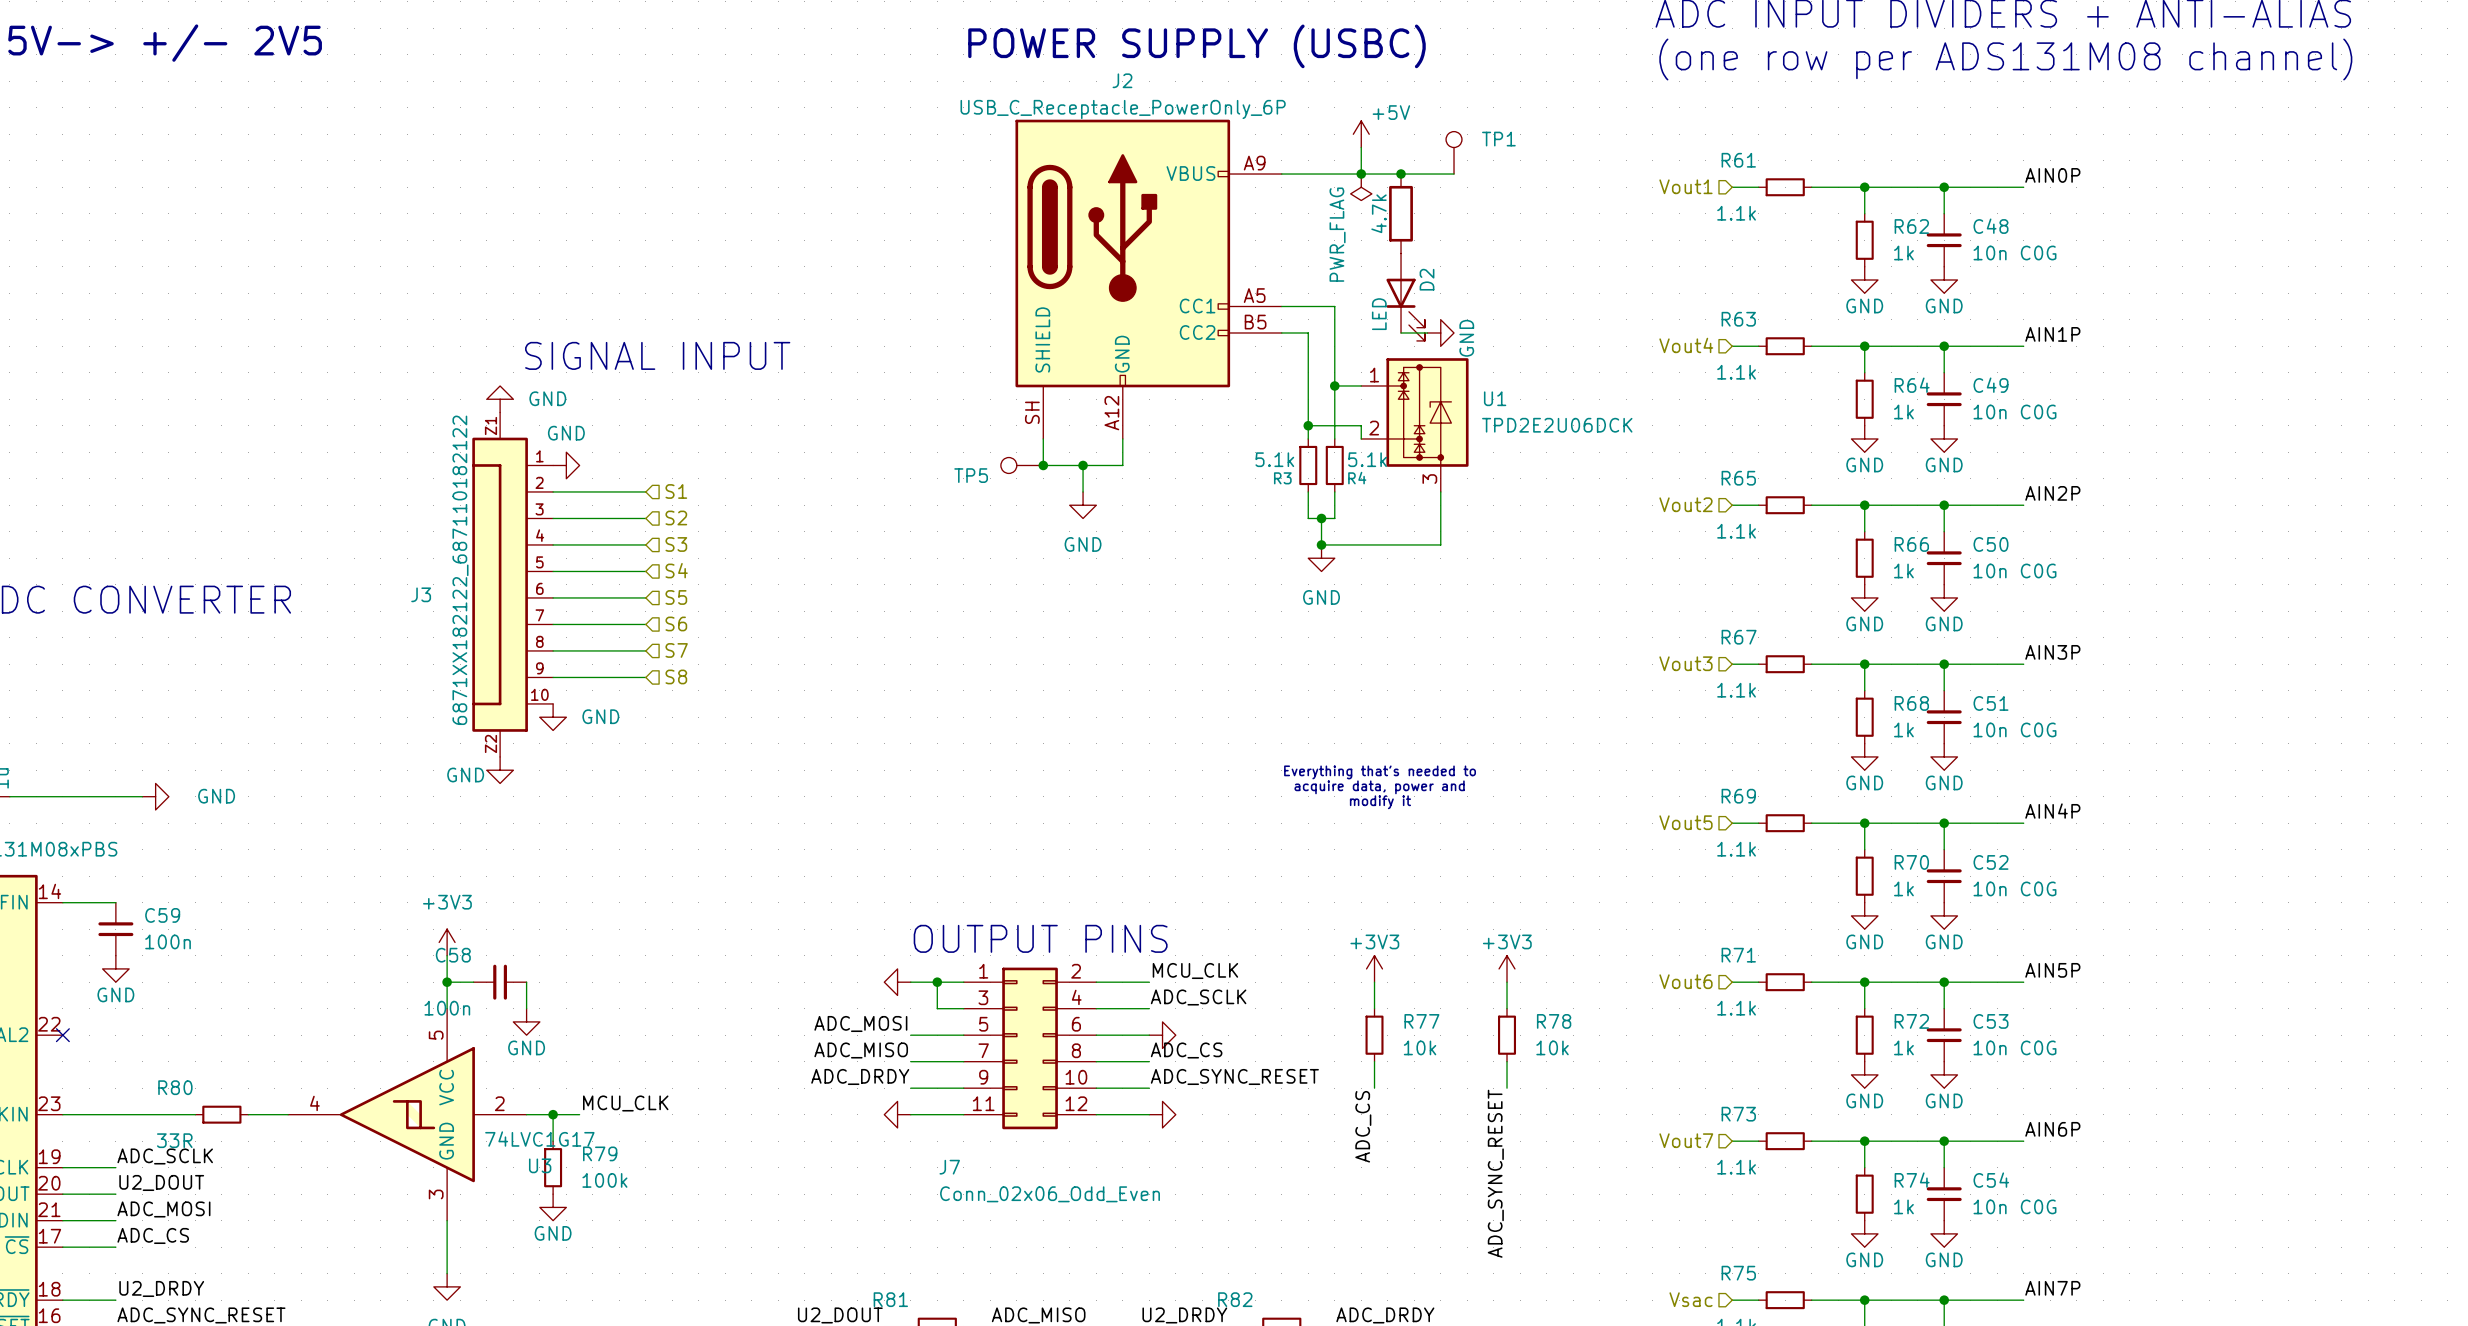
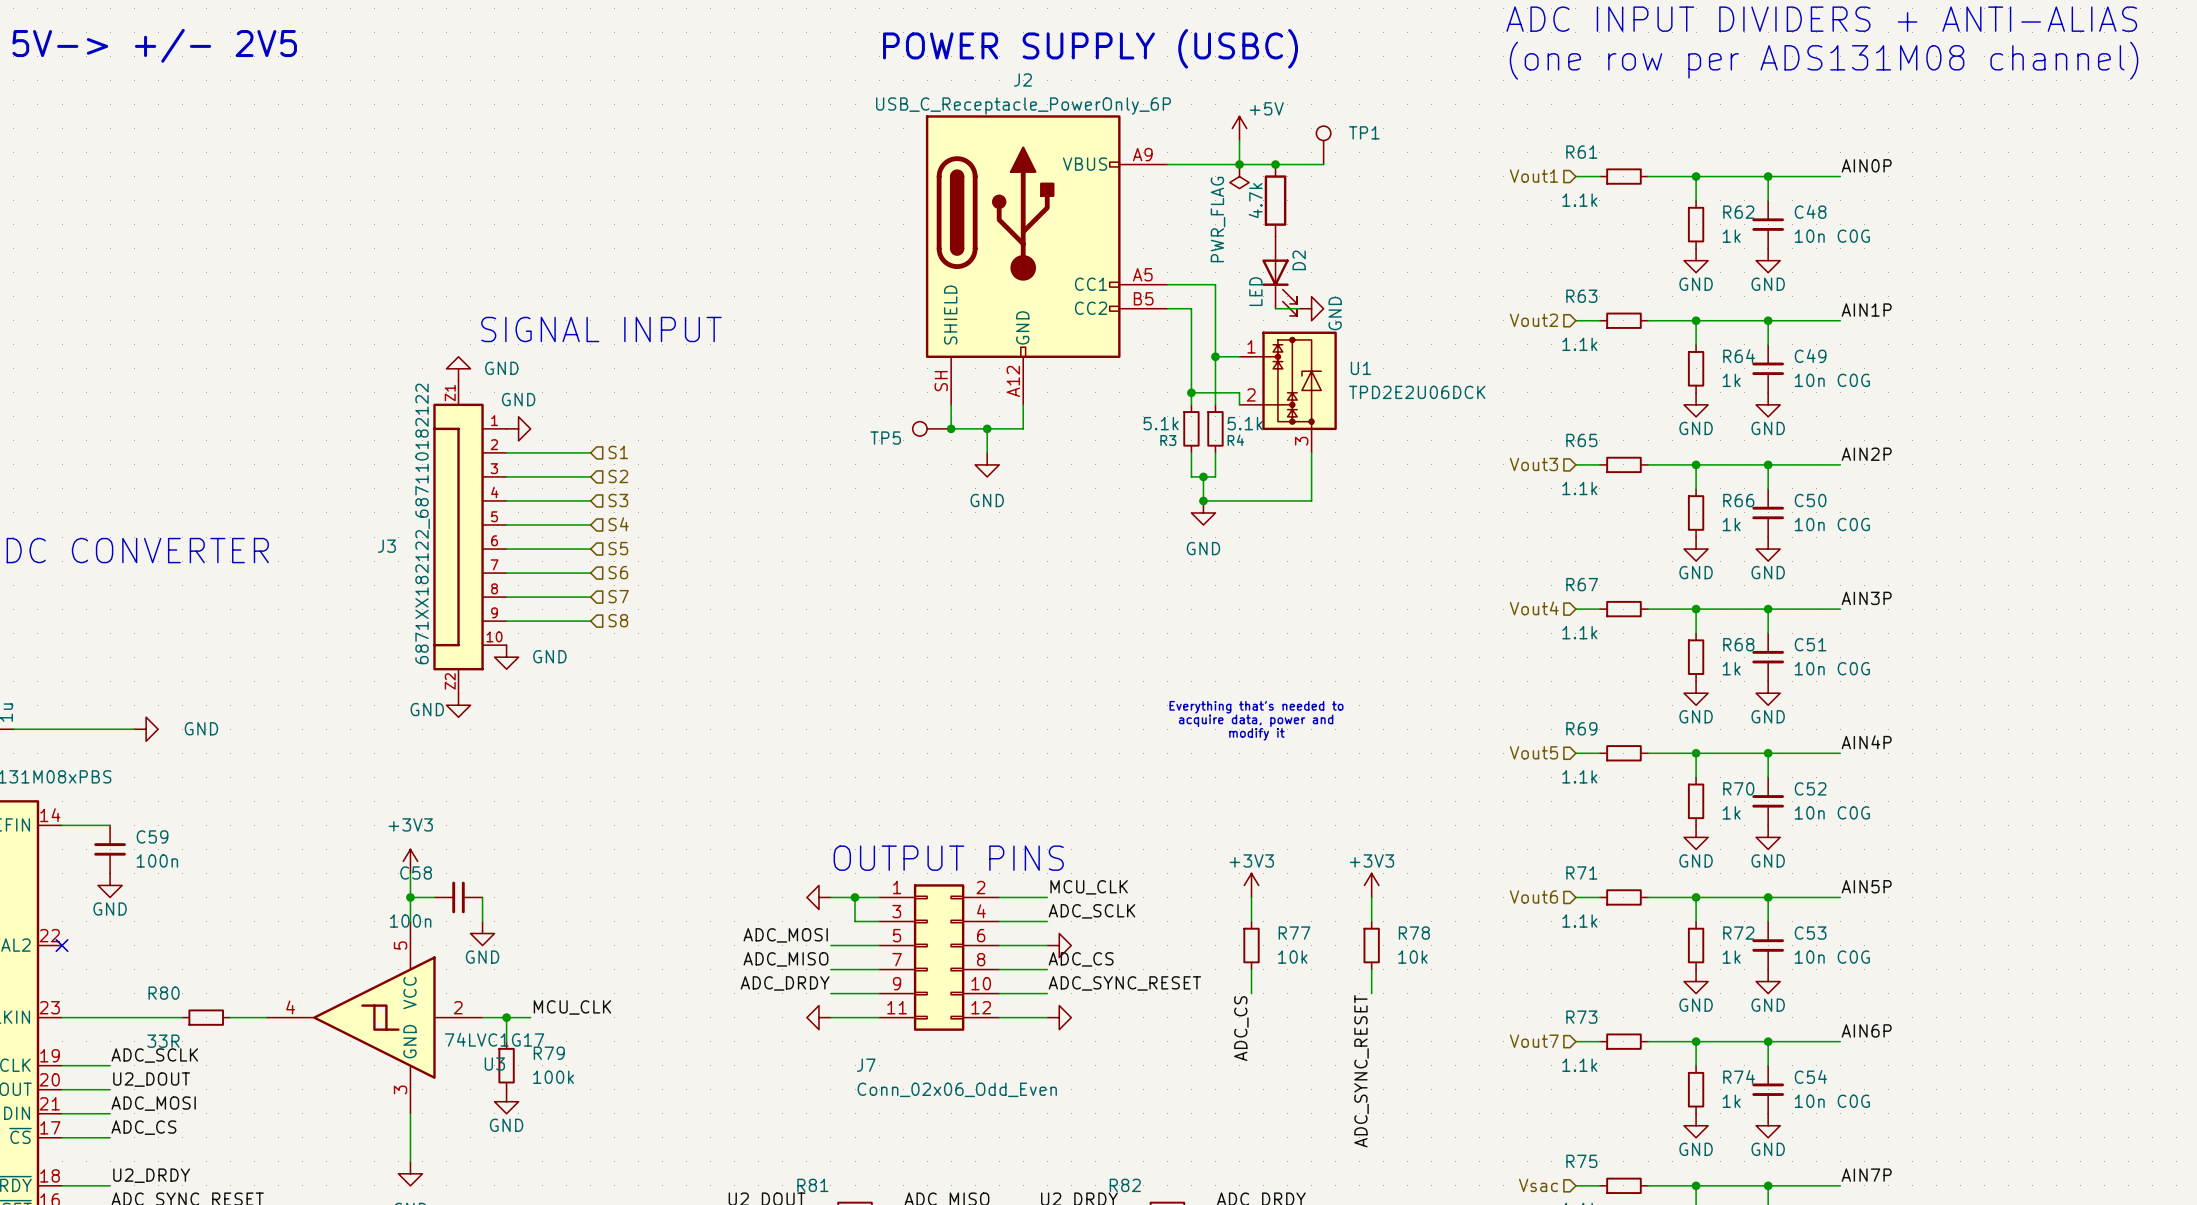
hierarchical label: Vout4 (1686, 345) -> Vout2 (1533, 320)
hierarchical label: Vout2 (1685, 504) -> Vout3 (1533, 464)
hierarchical label: Vout3 (1685, 663) -> Vout4 (1534, 608)

